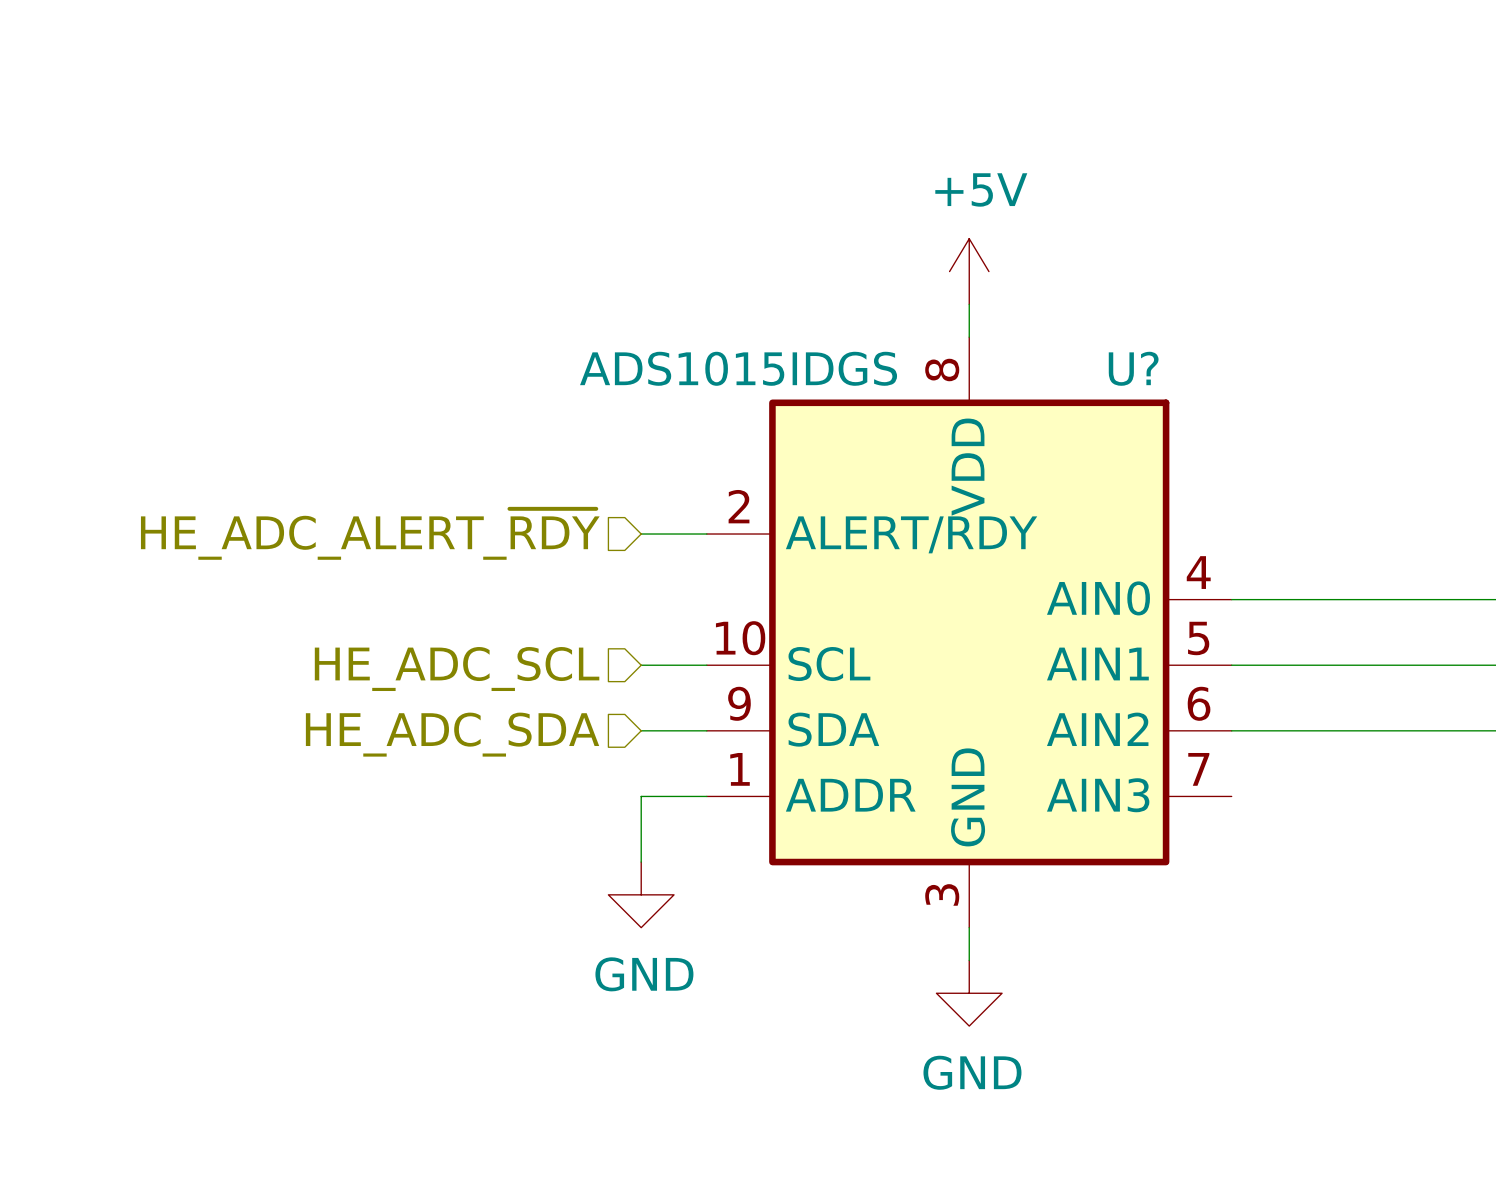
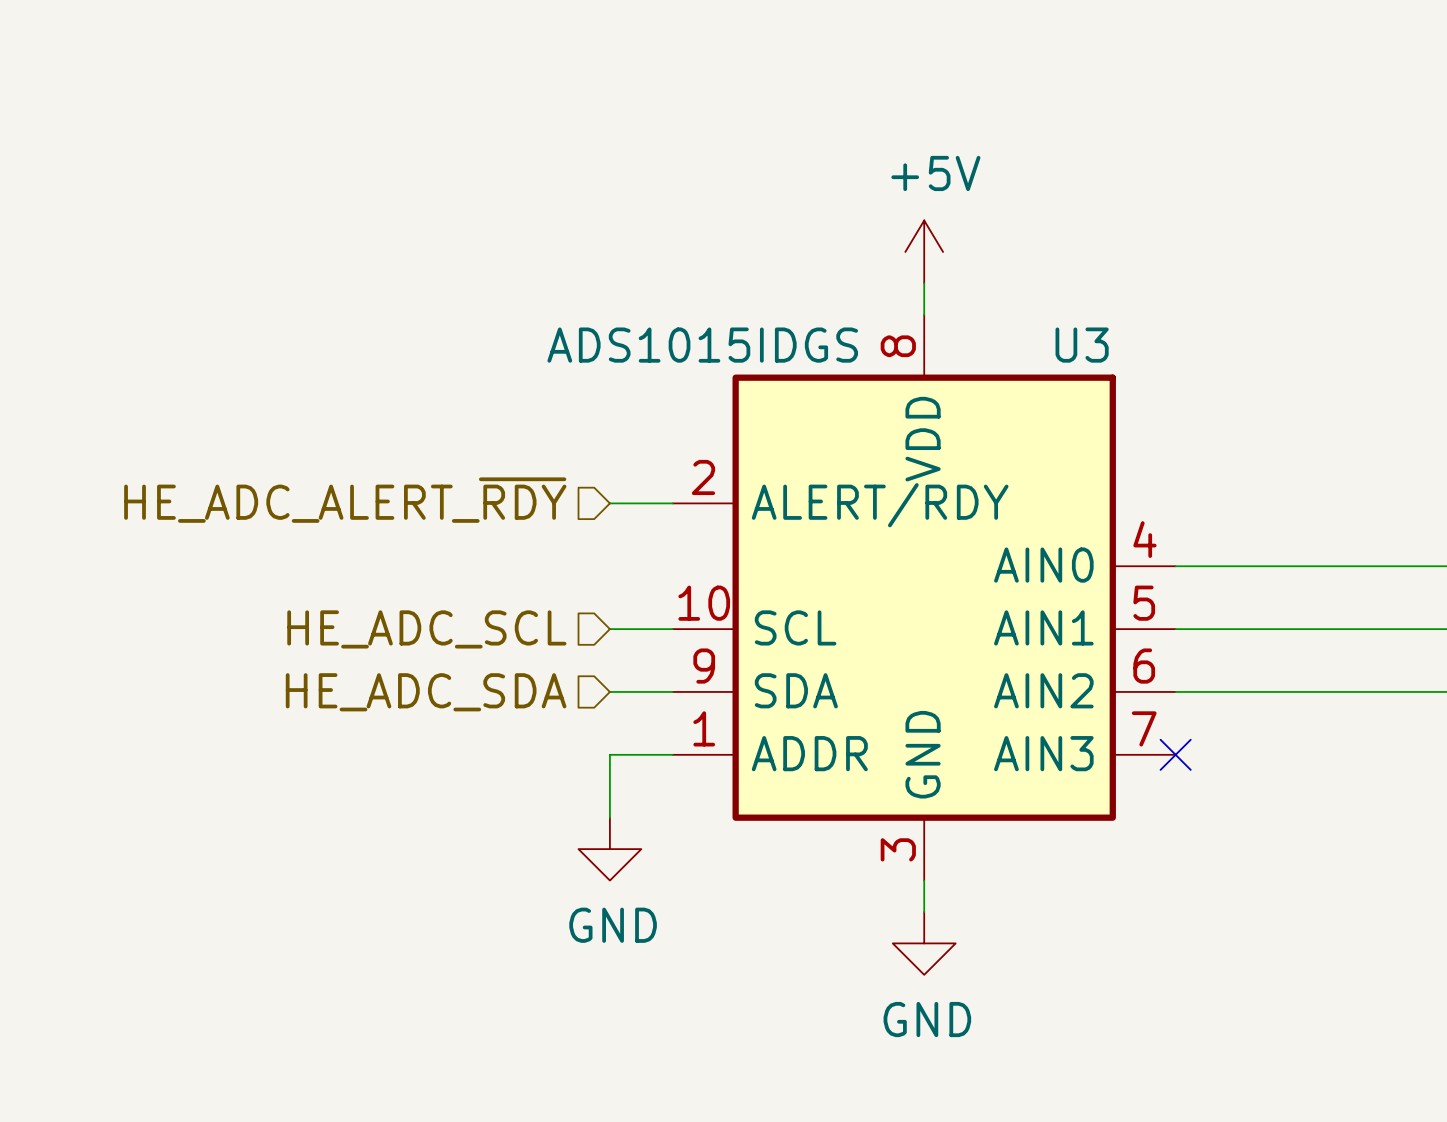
U? name: U? (1133, 368) -> U3 (1082, 345)
no-connect mark: none -> (1175, 754)

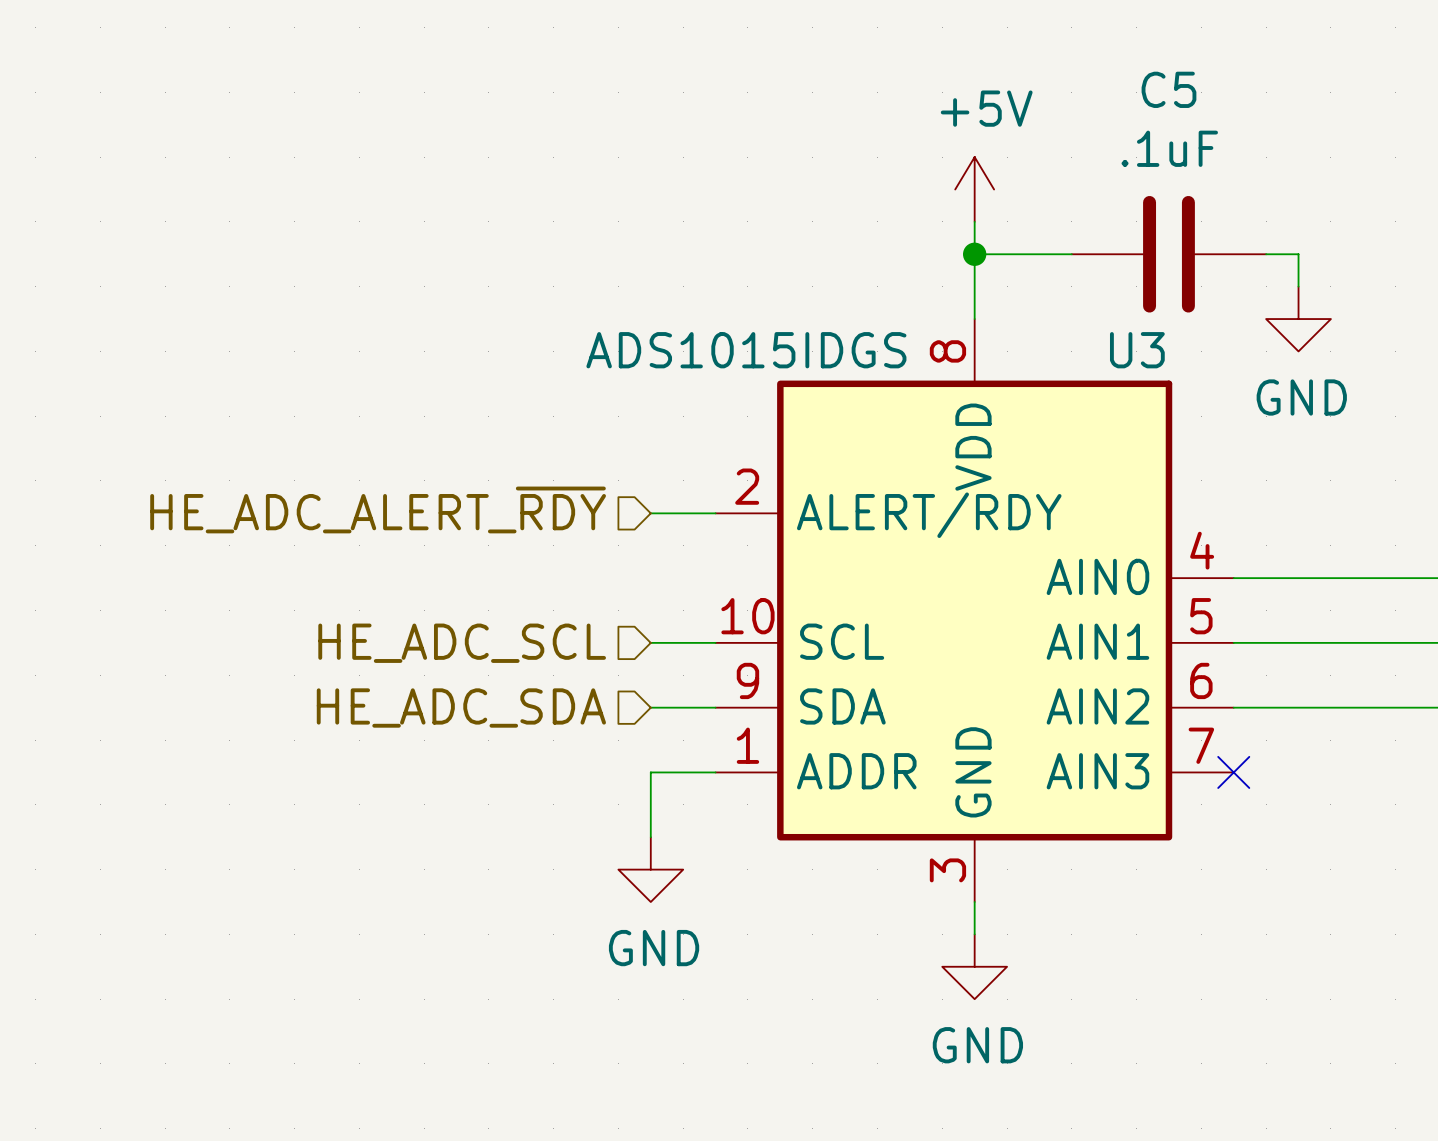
wire: none -> (974, 254) (1071, 254)
power symbol position: +5V (924, 251) -> +5V (974, 189)
junction: none -> (974, 254)
C5: none -> .1uF (1168, 254)
wire: none -> (1266, 254) (1298, 254) (1298, 286)
power symbol: none -> GND (1298, 319)

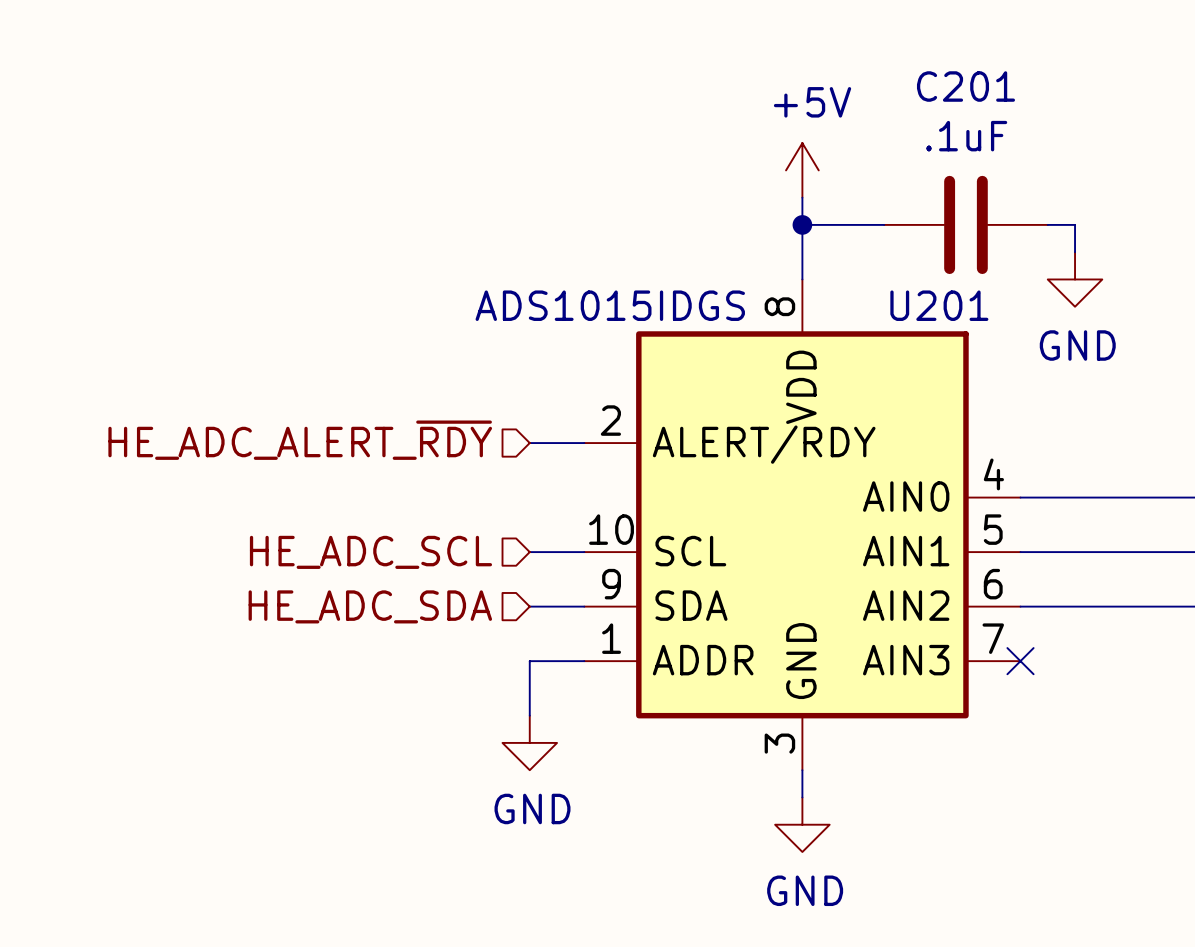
C5 name: C5 (1168, 89) -> C201 (965, 86)
U3 name: U3 (1137, 350) -> U201 (939, 305)

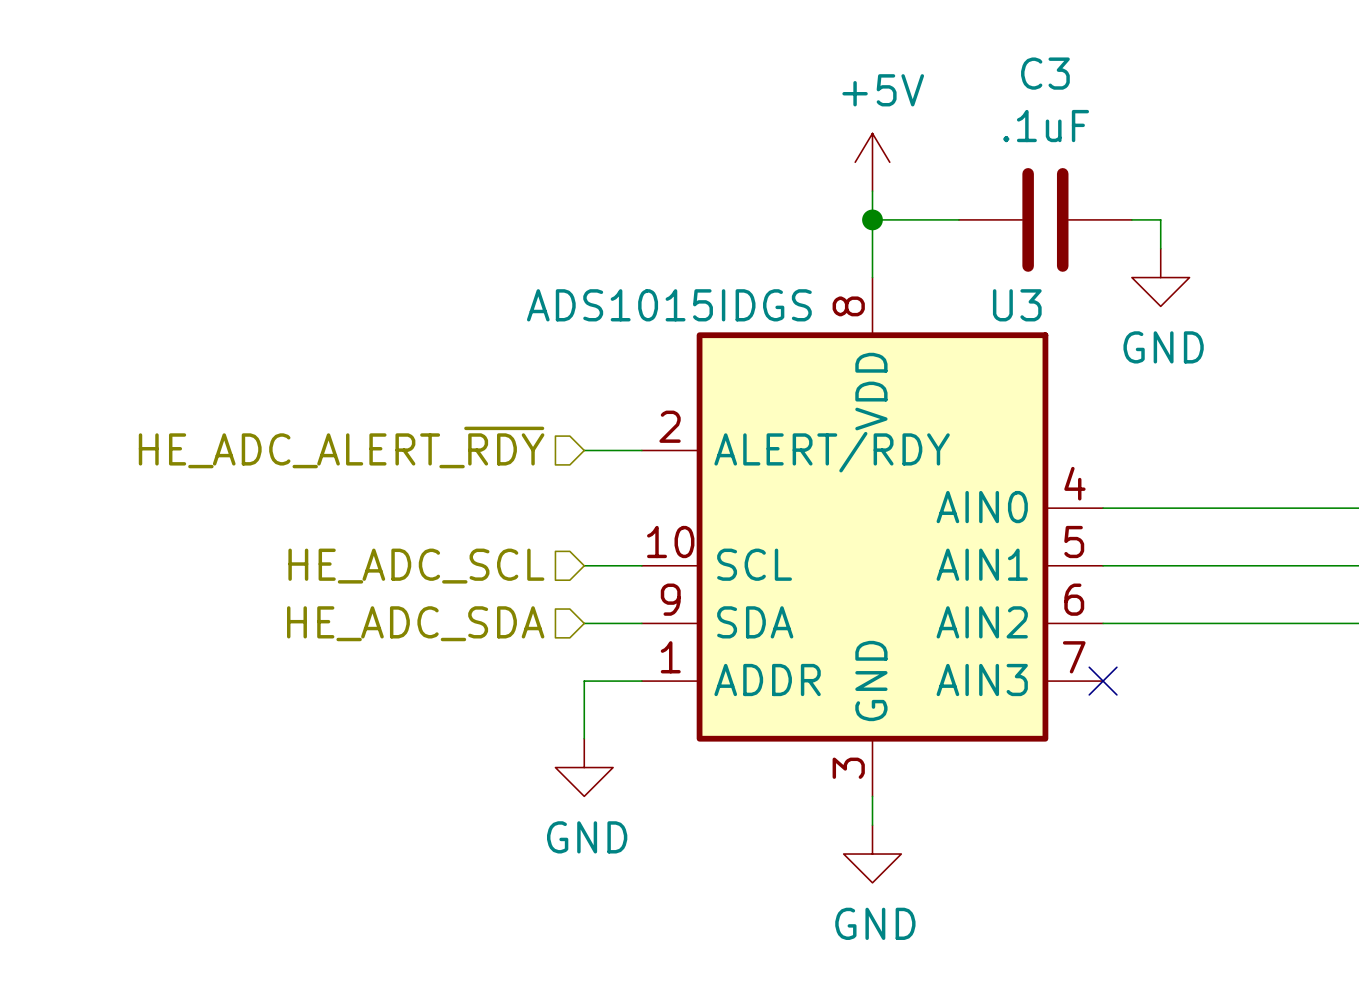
C201 name: C201 (965, 86) -> C3 (1045, 73)
U201 name: U201 (939, 305) -> U3 (1017, 305)

